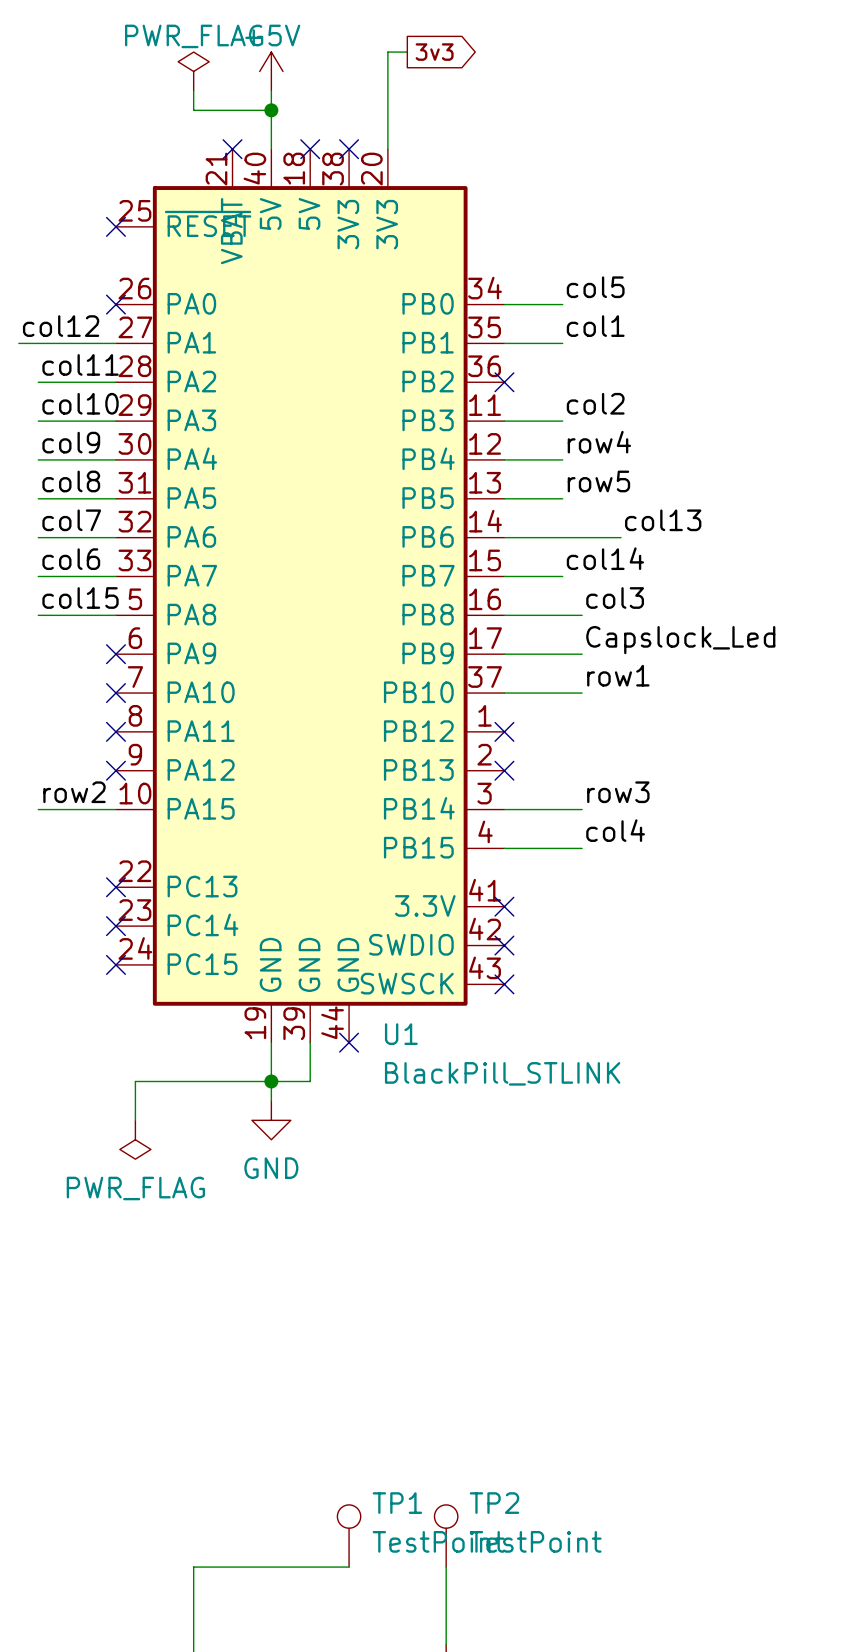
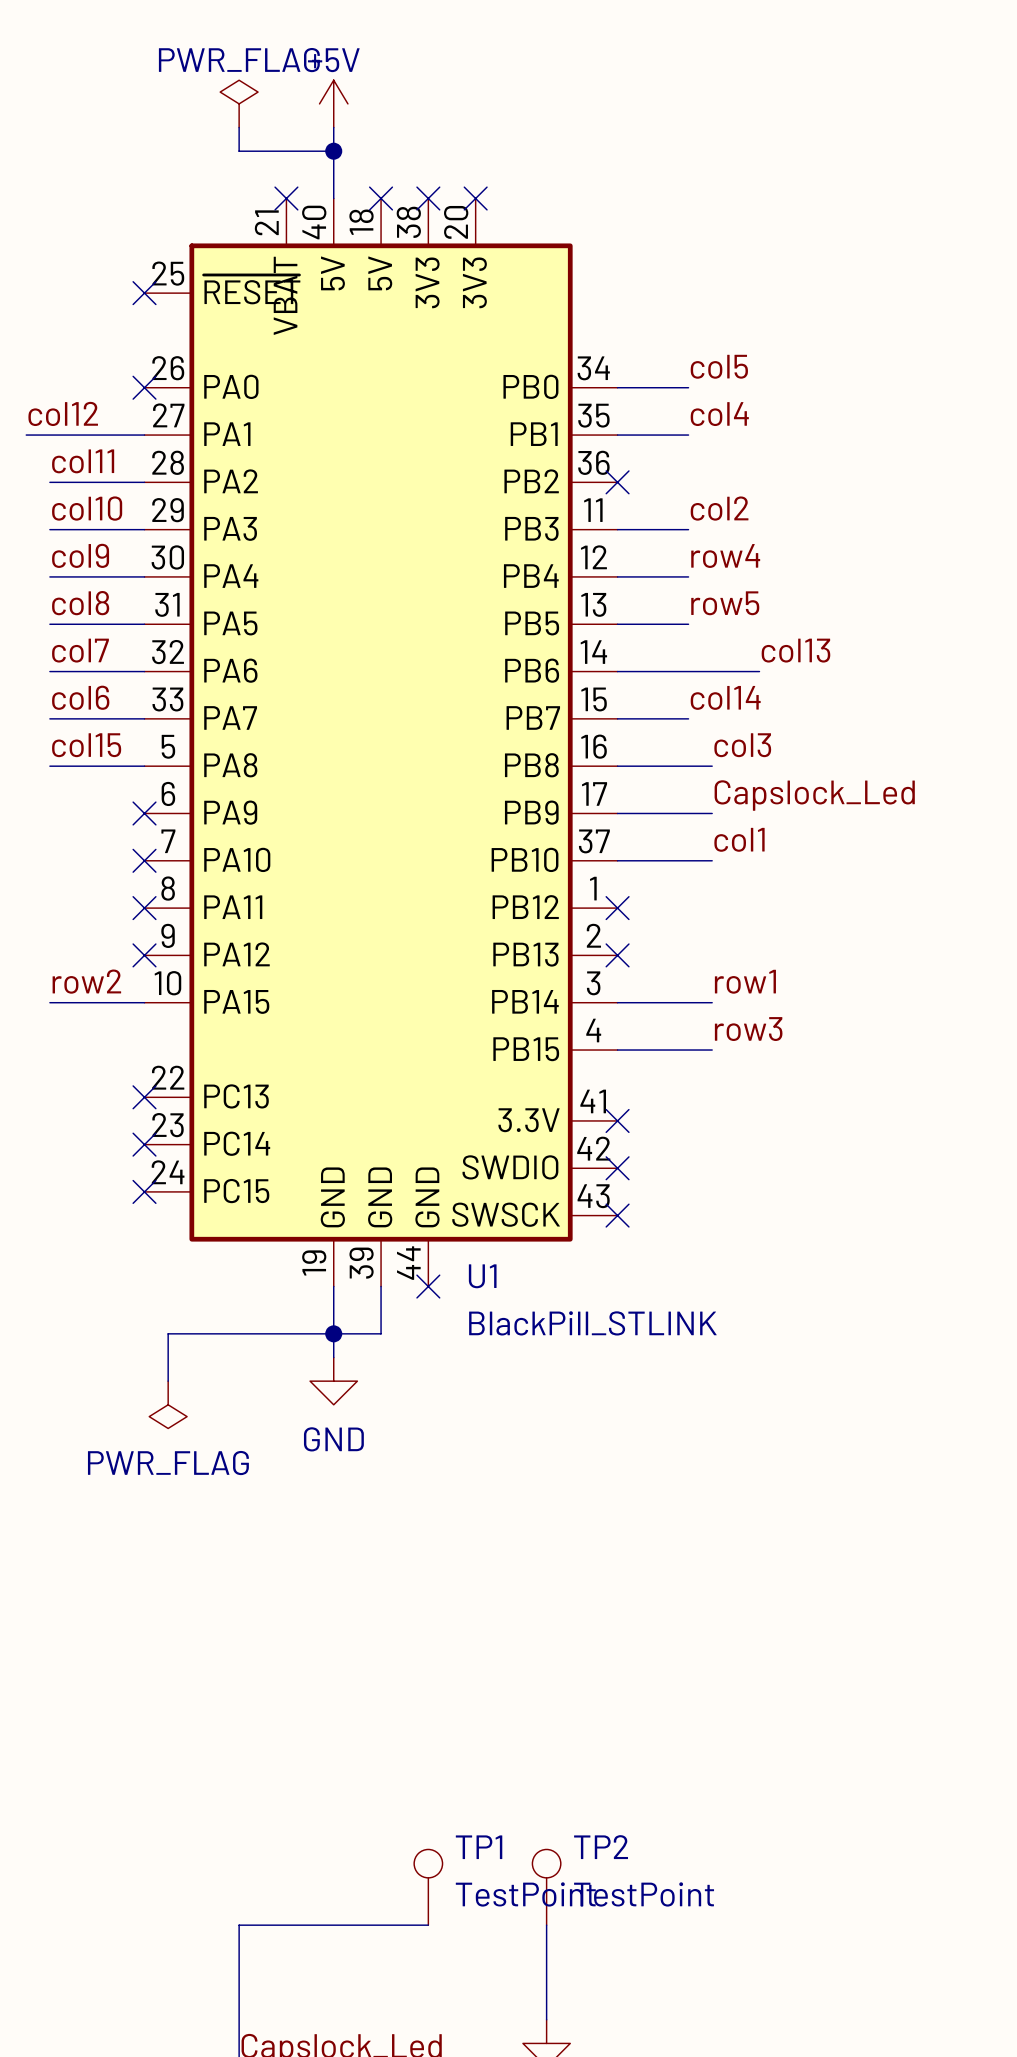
wire: (407, 52) (387, 52) (387, 149) -> none
global label: 3v3 (434, 52) -> none
no-connect mark: none -> (475, 198)
label: col1 (595, 326) -> col4 (719, 414)
label: row1 (618, 675) -> col1 (739, 839)
label: row3 (618, 792) -> row1 (745, 981)
label: col4 (615, 830) -> row3 (748, 1029)

